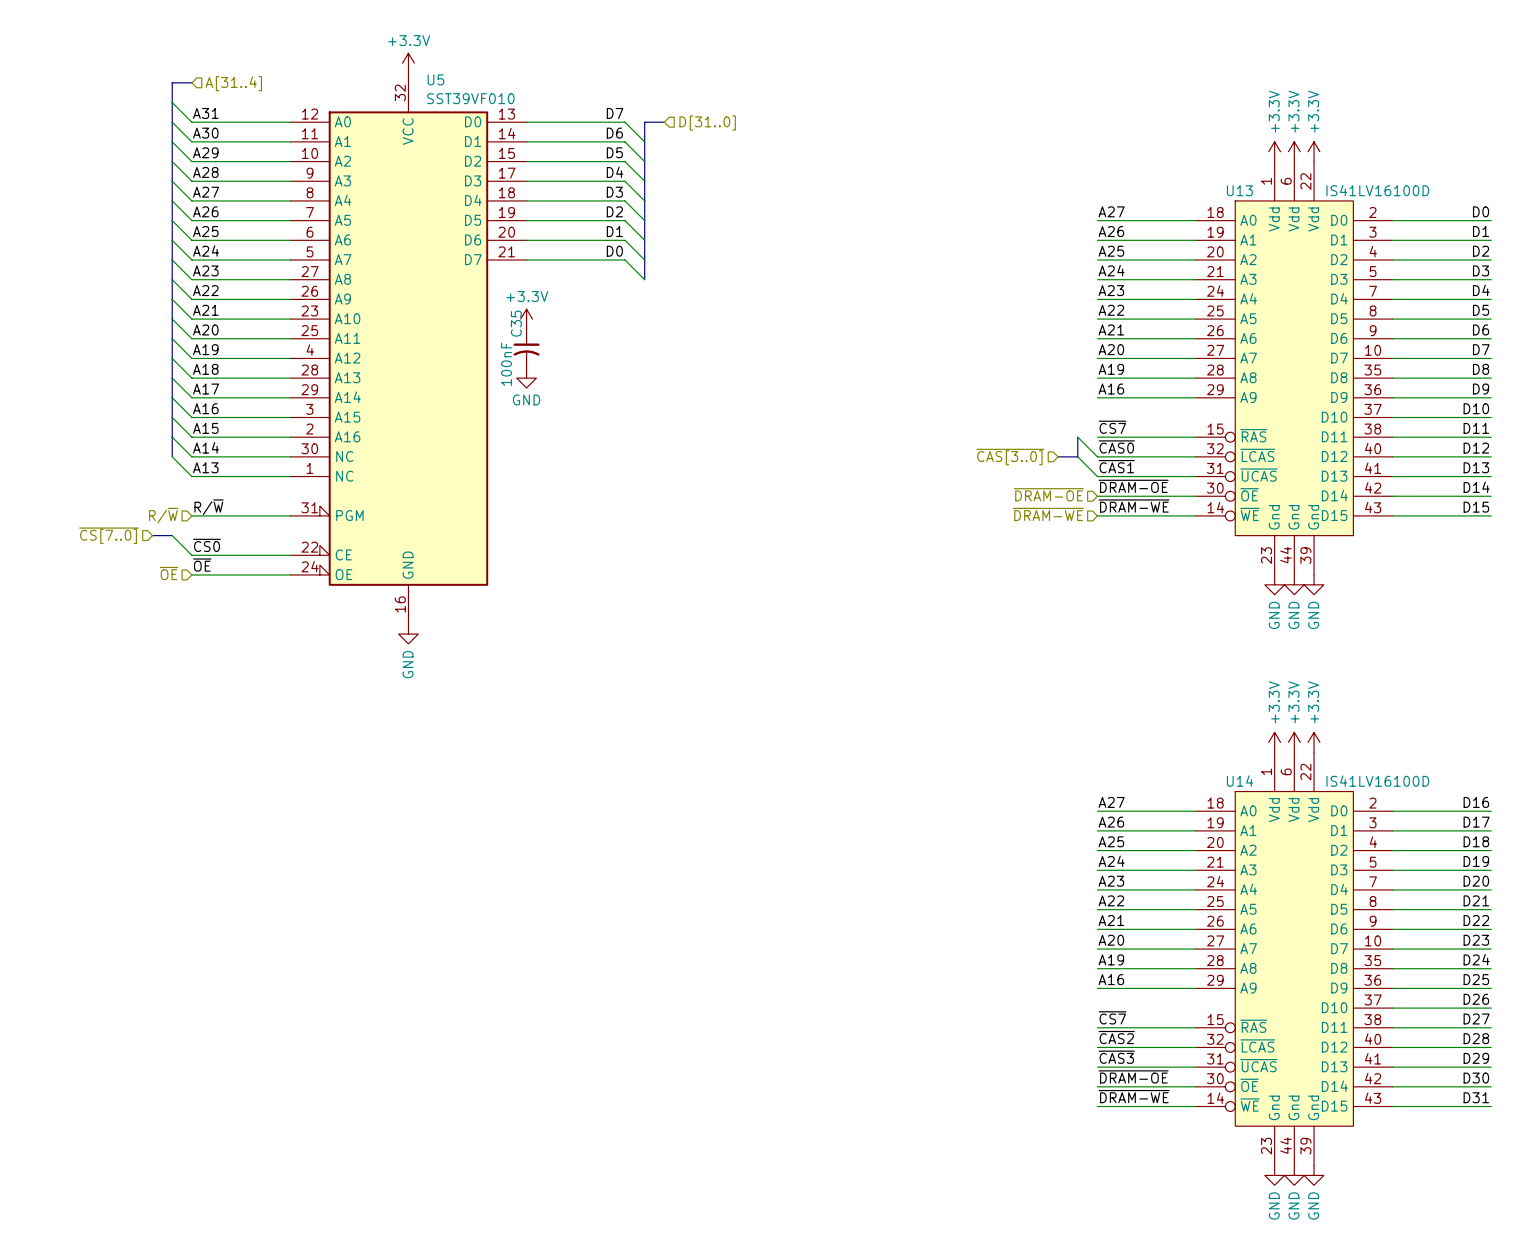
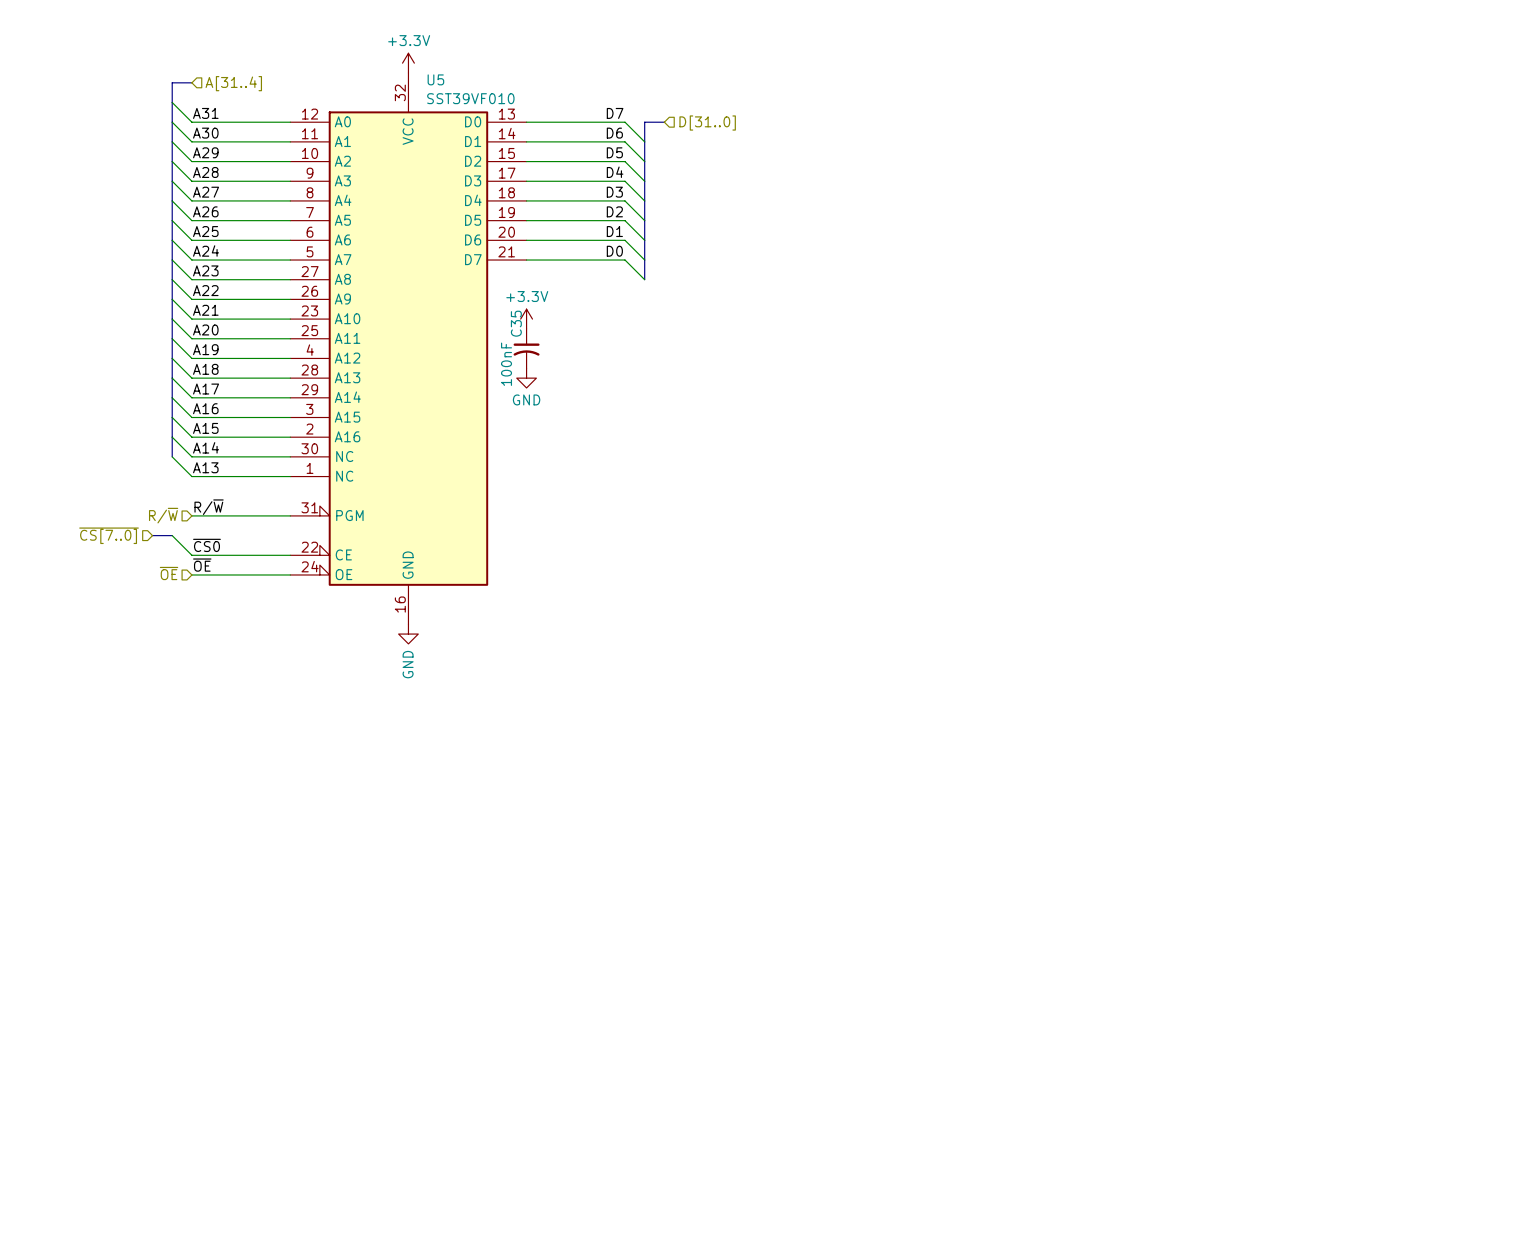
power symbol: +3.3V (1274, 151) -> none
power symbol: +3.3V (1294, 151) -> none
power symbol: +3.3V (1314, 151) -> none
label: A27 (1111, 211) -> none
label: D0 (1481, 211) -> none
wire: (1097, 220) (1195, 220) -> none
wire: (1392, 220) (1491, 220) -> none
label: A26 (1111, 231) -> none
label: D1 (1481, 231) -> none
wire: (1097, 240) (1195, 240) -> none
wire: (1392, 240) (1491, 240) -> none
label: A25 (1111, 251) -> none
label: D2 (1481, 251) -> none
wire: (1097, 260) (1195, 260) -> none
wire: (1392, 260) (1491, 260) -> none
label: A24 (1111, 270) -> none
label: D3 (1481, 270) -> none
wire: (1097, 279) (1195, 279) -> none
wire: (1392, 279) (1491, 279) -> none
label: A23 (1111, 290) -> none
label: D4 (1481, 290) -> none
wire: (1097, 299) (1195, 299) -> none
wire: (1392, 299) (1491, 299) -> none
label: A22 (1111, 310) -> none
label: D5 (1481, 310) -> none
wire: (1097, 319) (1195, 319) -> none
wire: (1392, 319) (1491, 319) -> none
label: A21 (1111, 329) -> none
label: D6 (1481, 329) -> none
wire: (1097, 338) (1195, 338) -> none
wire: (1392, 338) (1491, 338) -> none
label: A20 (1111, 349) -> none
label: D7 (1481, 349) -> none
wire: (1097, 358) (1195, 358) -> none
wire: (1392, 358) (1491, 358) -> none
U13: IS41LV16100D (1294, 368) -> none
label: A19 (1111, 369) -> none
label: D8 (1481, 369) -> none
wire: (1097, 378) (1195, 378) -> none
wire: (1392, 378) (1491, 378) -> none
label: A16 (1111, 389) -> none
label: D9 (1481, 389) -> none
wire: (1097, 397) (1195, 397) -> none
wire: (1392, 397) (1491, 397) -> none
label: D10 (1476, 408) -> none
wire: (1392, 417) (1491, 417) -> none
label: ~{CS7} (1112, 427) -> none
label: D11 (1476, 428) -> none
wire: (1077, 437) (1097, 456) (1195, 456) -> none
bus: (1077, 437) (1077, 456) (1058, 456) -> none
wire: (1097, 437) (1195, 437) -> none
wire: (1392, 437) (1491, 437) -> none
label: ~{CAS0} (1116, 446) -> none
label: D12 (1476, 448) -> none
wire: (1077, 456) (1097, 476) (1195, 476) -> none
wire: (1392, 456) (1491, 456) -> none
hierarchical label: ~{CAS[3..0]} (1010, 457) -> none
label: ~{CAS1} (1116, 466) -> none
label: D13 (1476, 467) -> none
wire: (1392, 476) (1491, 476) -> none
label: ~{DRAM-OE} (1133, 486) -> none
label: D14 (1476, 487) -> none
hierarchical label: ~{DRAM-OE} (1048, 494) -> none
wire: (1097, 496) (1195, 496) -> none
wire: (1392, 496) (1491, 496) -> none
label: ~{DRAM-WE} (1134, 506) -> none
label: D15 (1476, 507) -> none
hierarchical label: ~{DRAM-WE} (1048, 514) -> none
wire: (1097, 515) (1195, 515) -> none
wire: (1392, 515) (1491, 515) -> none
power symbol: GND (1274, 584) -> none
power symbol: GND (1294, 584) -> none
power symbol: GND (1314, 584) -> none
power symbol: +3.3V (1274, 742) -> none
power symbol: +3.3V (1294, 742) -> none
power symbol: +3.3V (1314, 742) -> none
label: A27 (1111, 802) -> none
label: D16 (1476, 802) -> none
wire: (1097, 811) (1195, 811) -> none
wire: (1392, 811) (1491, 811) -> none
label: A26 (1111, 822) -> none
label: D17 (1476, 822) -> none
wire: (1097, 830) (1195, 830) -> none
wire: (1392, 830) (1491, 830) -> none
label: A25 (1111, 841) -> none
label: D18 (1476, 841) -> none
wire: (1097, 850) (1195, 850) -> none
wire: (1392, 850) (1491, 850) -> none
label: A24 (1111, 861) -> none
label: D19 (1476, 861) -> none
wire: (1097, 870) (1195, 870) -> none
wire: (1392, 870) (1491, 870) -> none
label: A23 (1111, 881) -> none
label: D20 (1476, 881) -> none
wire: (1097, 889) (1195, 889) -> none
wire: (1392, 889) (1491, 889) -> none
label: A22 (1111, 900) -> none
label: D21 (1476, 900) -> none
wire: (1097, 909) (1195, 909) -> none
wire: (1392, 909) (1491, 909) -> none
label: A21 (1111, 920) -> none
label: D22 (1476, 920) -> none
wire: (1097, 929) (1195, 929) -> none
wire: (1392, 929) (1491, 929) -> none
label: A20 (1111, 940) -> none
label: D23 (1476, 940) -> none
wire: (1097, 949) (1195, 949) -> none
wire: (1392, 949) (1491, 949) -> none
U14: IS41LV16100D (1294, 958) -> none
label: A19 (1111, 959) -> none
label: D24 (1476, 959) -> none
wire: (1097, 968) (1195, 968) -> none
wire: (1392, 968) (1491, 968) -> none
label: A16 (1111, 979) -> none
label: D25 (1476, 979) -> none
wire: (1097, 988) (1195, 988) -> none
wire: (1392, 988) (1491, 988) -> none
label: D26 (1476, 999) -> none
wire: (1392, 1008) (1491, 1008) -> none
label: ~{CS7} (1112, 1017) -> none
label: D27 (1476, 1018) -> none
wire: (1097, 1027) (1195, 1027) -> none
wire: (1392, 1027) (1491, 1027) -> none
label: ~{CAS2} (1116, 1037) -> none
label: D28 (1476, 1038) -> none
wire: (1097, 1047) (1195, 1047) -> none
wire: (1392, 1047) (1491, 1047) -> none
label: ~{CAS3} (1116, 1057) -> none
label: D29 (1476, 1058) -> none
wire: (1097, 1067) (1195, 1067) -> none
wire: (1392, 1067) (1491, 1067) -> none
label: ~{DRAM-OE} (1133, 1076) -> none
label: D30 (1476, 1078) -> none
wire: (1097, 1086) (1195, 1086) -> none
wire: (1392, 1086) (1491, 1086) -> none
label: ~{DRAM-WE} (1134, 1096) -> none
label: D31 (1476, 1097) -> none
wire: (1097, 1106) (1195, 1106) -> none
wire: (1392, 1106) (1491, 1106) -> none
power symbol: GND (1274, 1175) -> none
power symbol: GND (1294, 1175) -> none
power symbol: GND (1314, 1175) -> none

